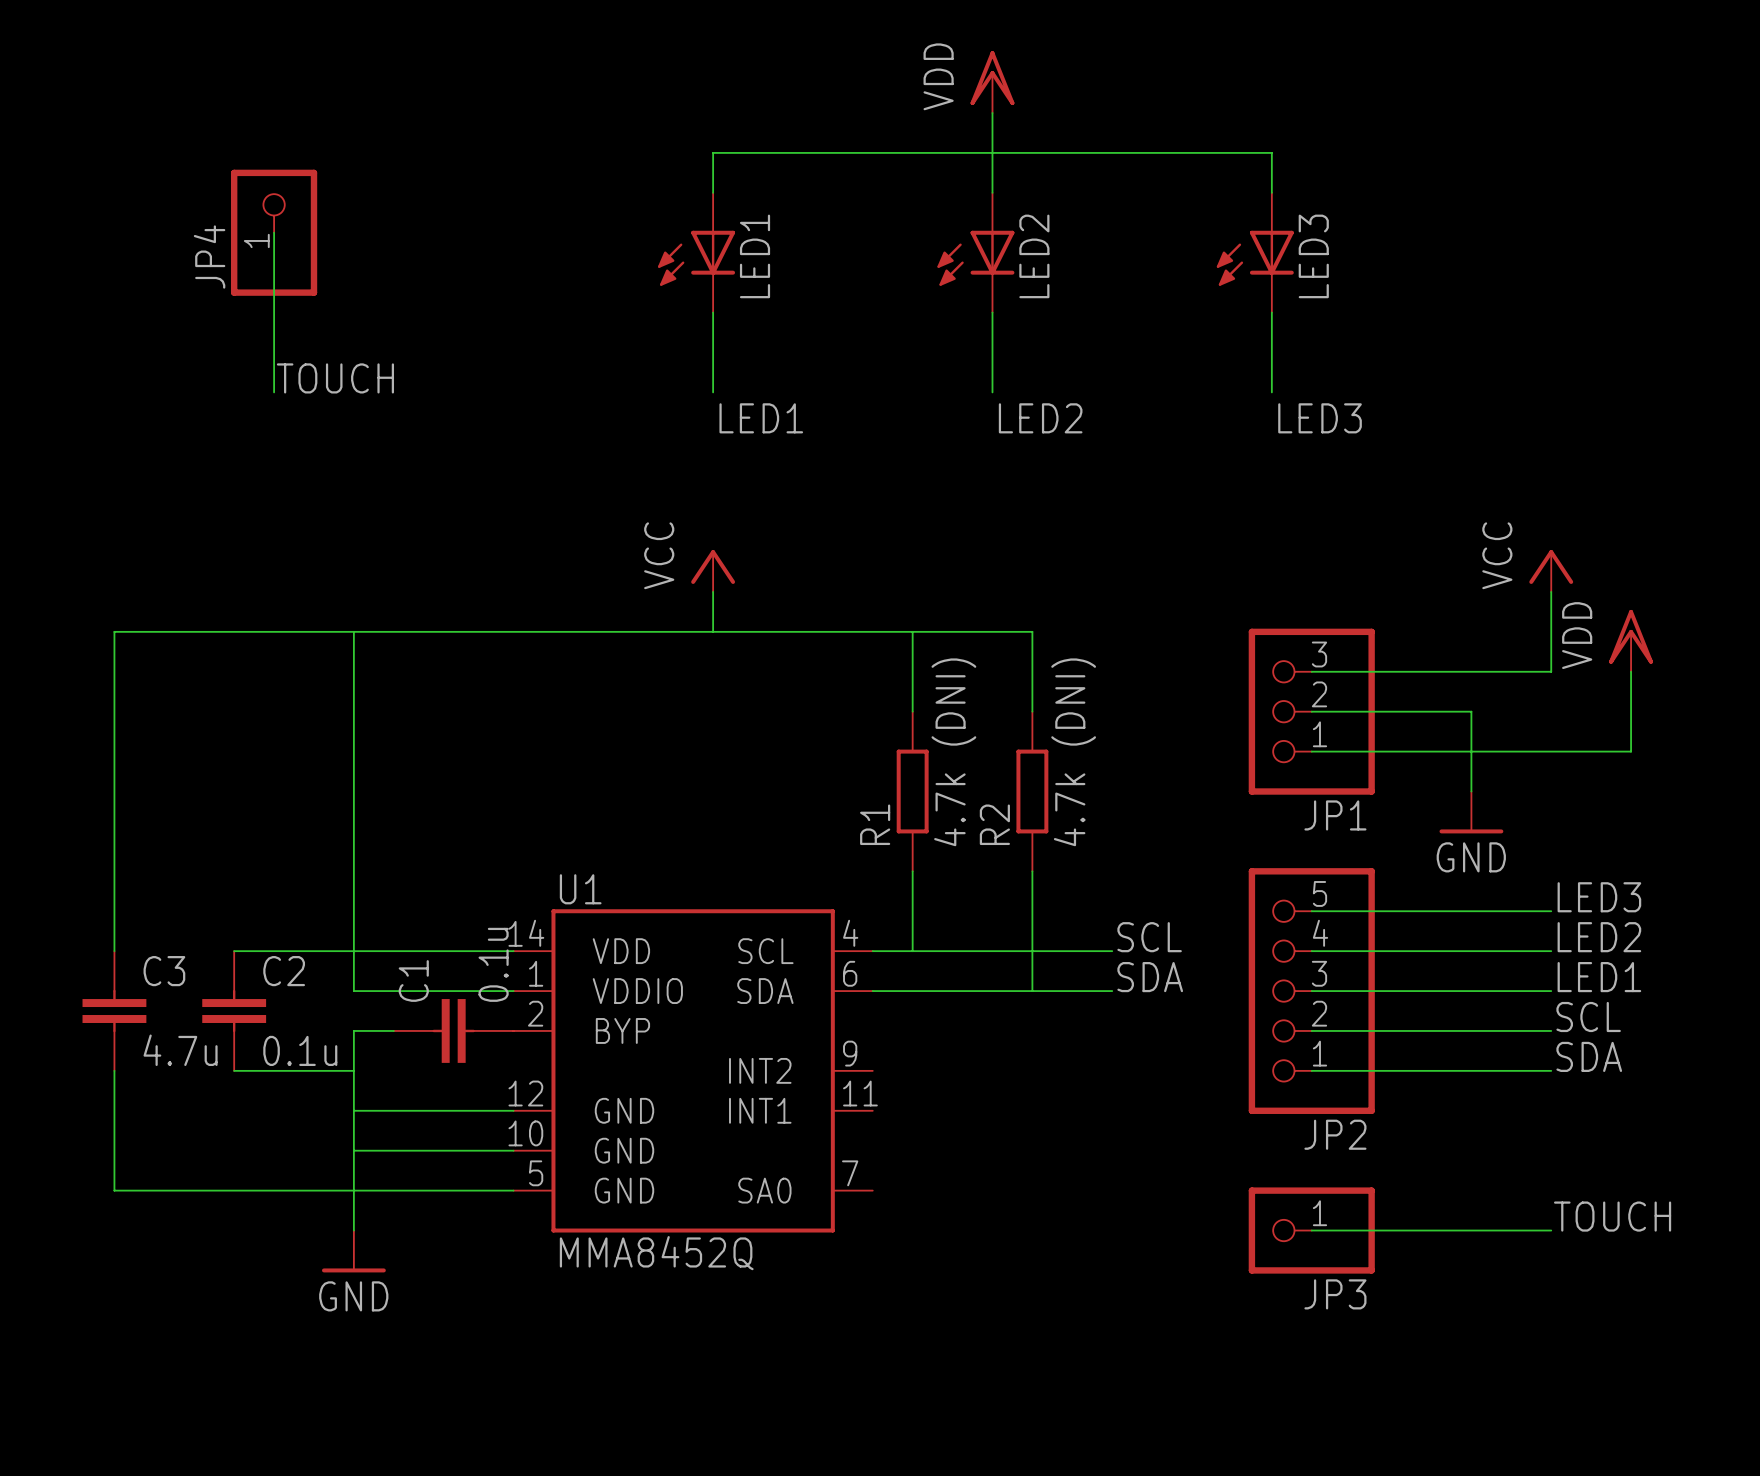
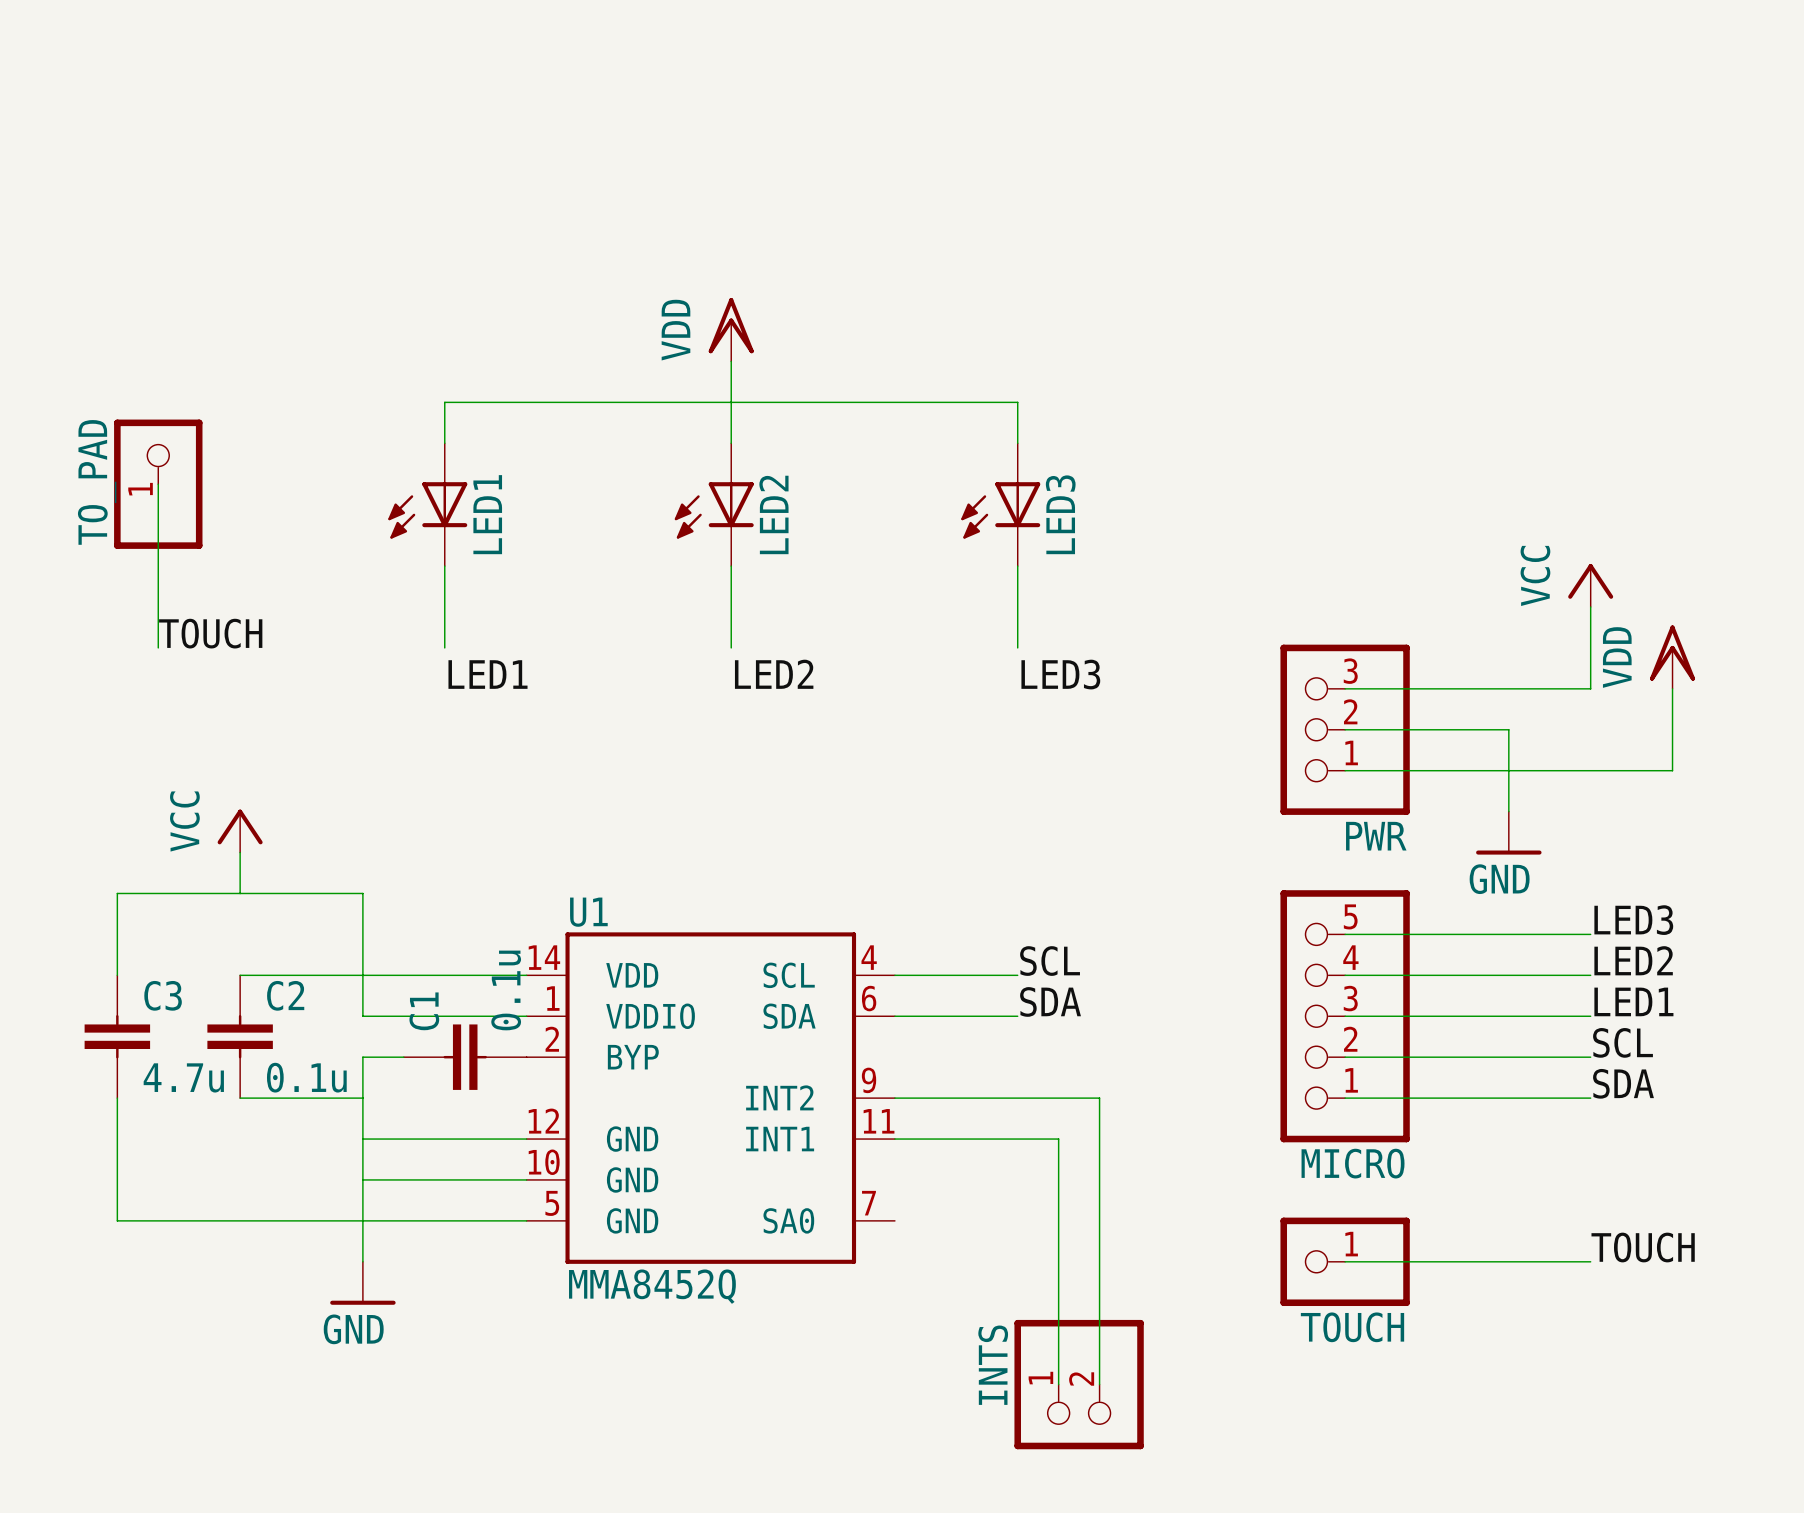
power symbol position: VDD (992, 82) -> VDD (731, 329)
wire: (992, 113) (992, 192) -> none
wire: (713, 192) (713, 152) (1271, 152) (1271, 192) -> (444, 443) (444, 402) (1017, 402) (1017, 443)
wire: (274, 232) (274, 392) -> (158, 484) (158, 647)
JP4: (274, 232) -> none
LED1 position: (696, 252) -> (427, 504)
LED2 position: (975, 252) -> (714, 504)
LED3 position: (1255, 252) -> (1000, 504)
wire: (992, 312) (992, 392) -> (1017, 566) (1017, 647)
wire: (1271, 312) (1271, 392) -> none
label position: TOUCH (335, 378) -> TOUCH (210, 633)
wire: none -> (731, 402) (731, 443)
label position: LED1 (761, 418) -> LED1 (487, 674)
label position: LED2 (1040, 418) -> LED2 (774, 674)
label position: LED3 (1320, 418) -> LED3 (1060, 674)
TO_PAD: none -> (158, 484)
wire: none -> (444, 566) (444, 647)
power symbol: VCC (713, 570) -> none
wire: (353, 631) (353, 871) -> (117, 893) (362, 893)
wire: (912, 631) (912, 711) -> none
wire: (1032, 711) (1032, 631) (114, 631) (114, 871) -> none
R1: 4.7k (DNI) (912, 791) -> none
R2: 4.7k (DNI) (1032, 791) -> none
power symbol: none -> VCC (240, 831)
JP1 name: JP1 (1335, 815) -> PWR (1376, 836)
wire: none -> (240, 852) (240, 893)
wire: (912, 871) (912, 951) -> none
wire: (1032, 871) (1032, 991) -> none
label position: SCL (1149, 937) -> SCL (1050, 961)
wire: (992, 951) (1112, 951) -> none
label position: SDA (1150, 977) -> SDA (1050, 1001)
wire: (992, 991) (1112, 991) -> none
wire: none -> (894, 1098) (1099, 1098) (1099, 1384)
wire: none -> (894, 1139) (1058, 1139) (1058, 1384)
JP2 name: JP2 (1335, 1134) -> MICRO (1353, 1163)
JP3 name: JP3 (1335, 1294) -> TOUCH (1352, 1327)
INTS: none -> (1079, 1384)

